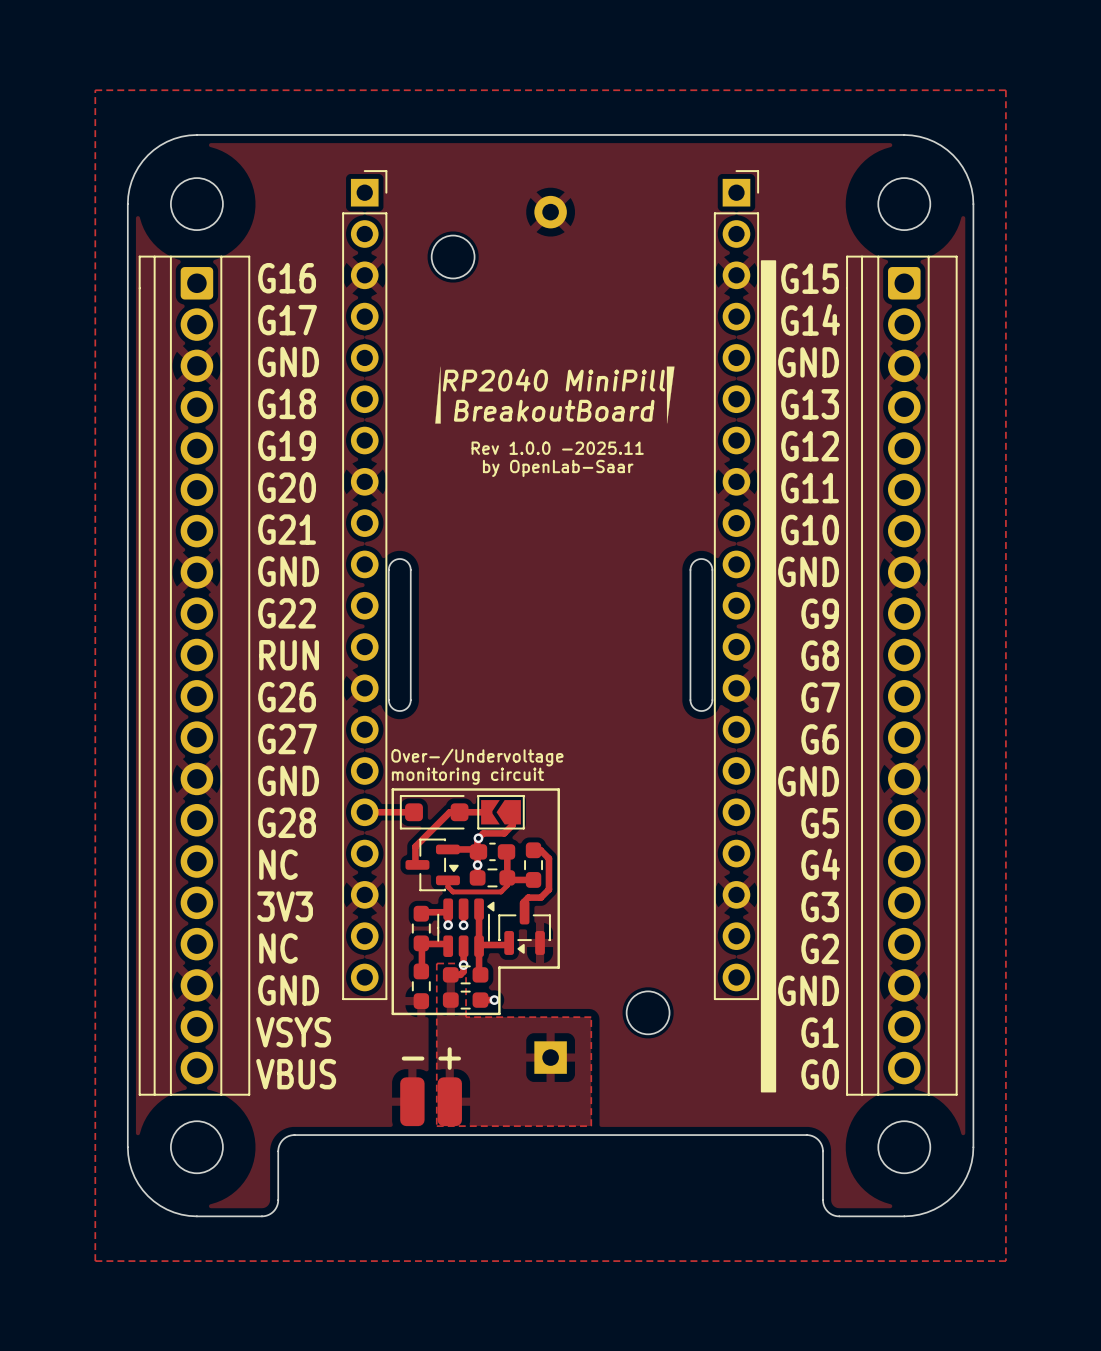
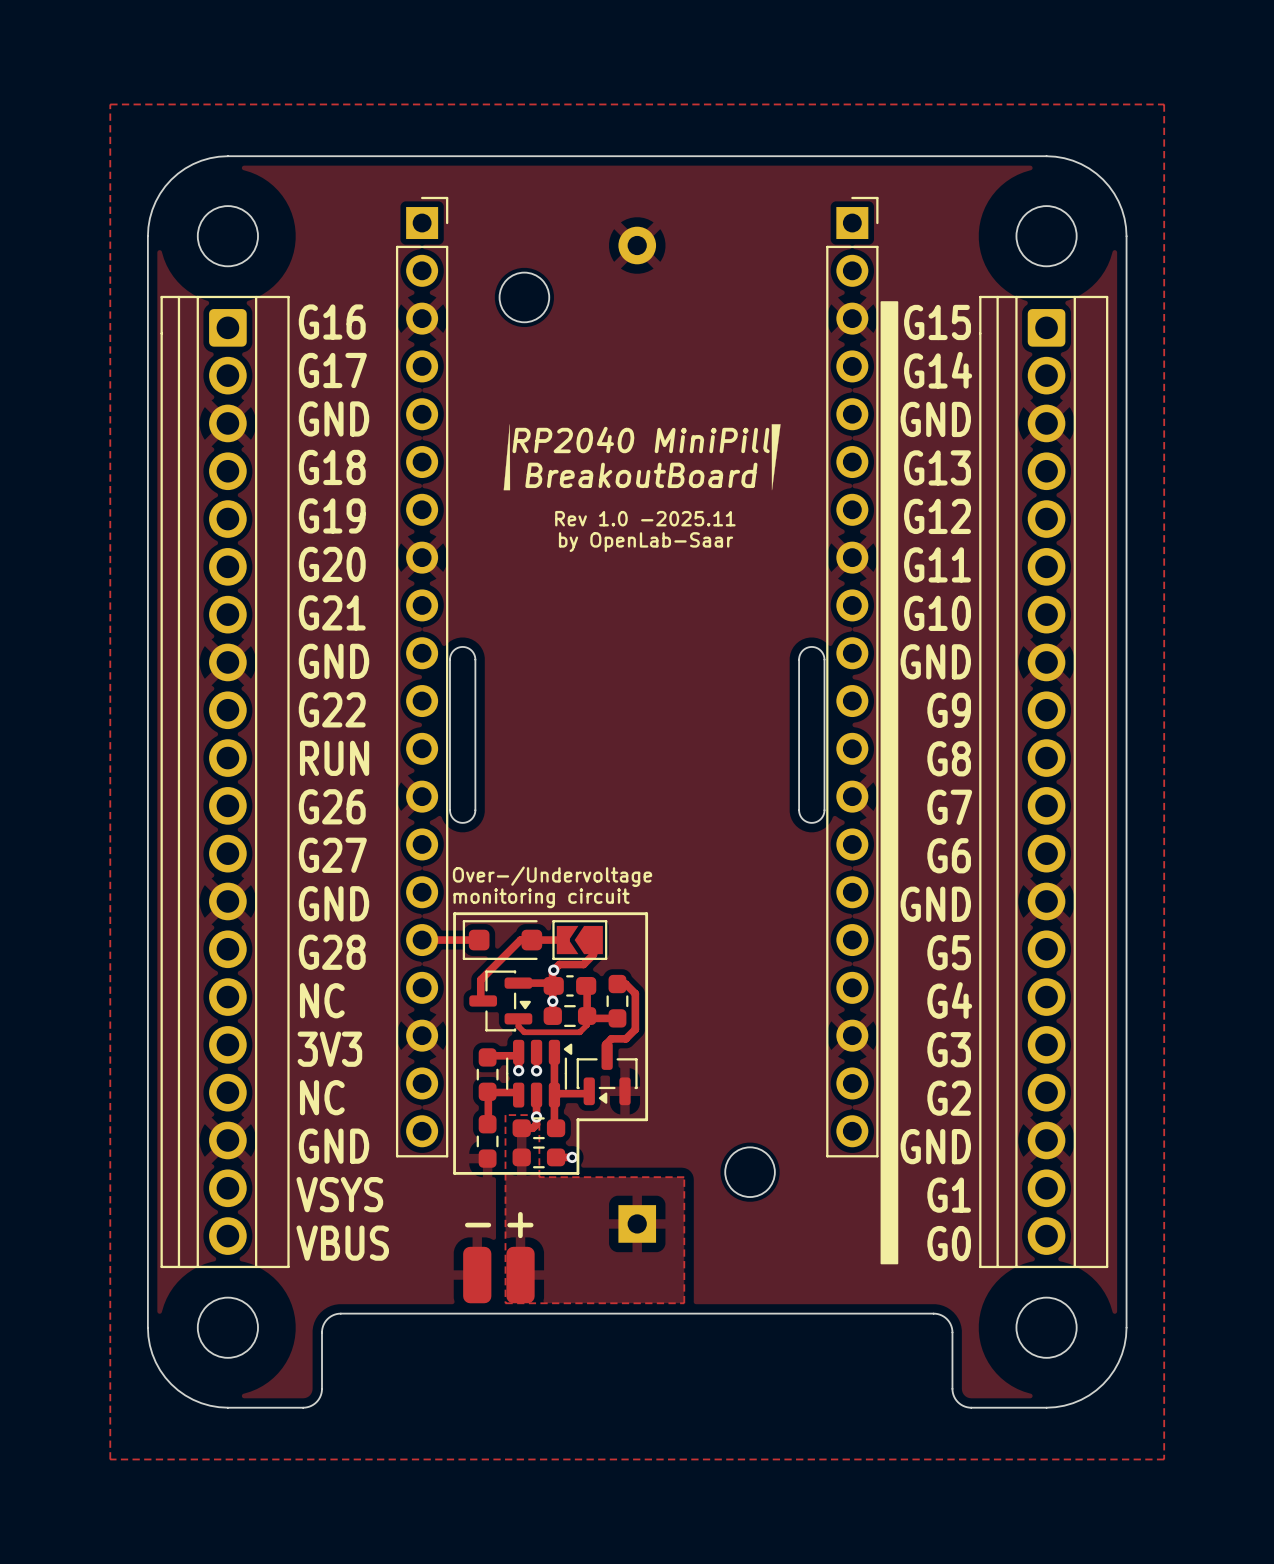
text: Rev 1.0.0 -2025.11 (557, 448) -> Rev 1.0 -2025.11 (645, 518)

